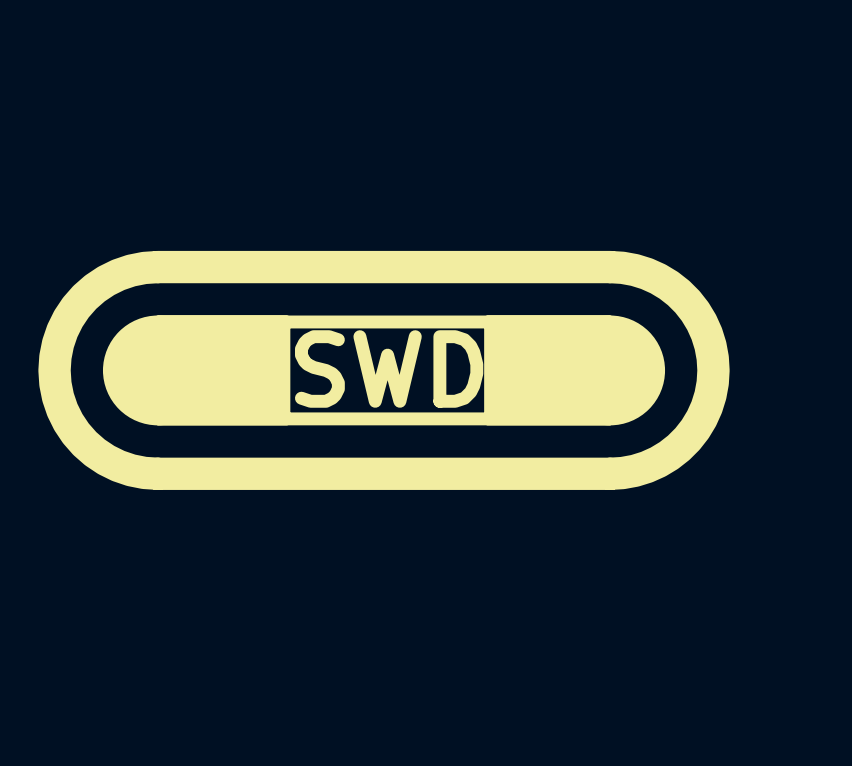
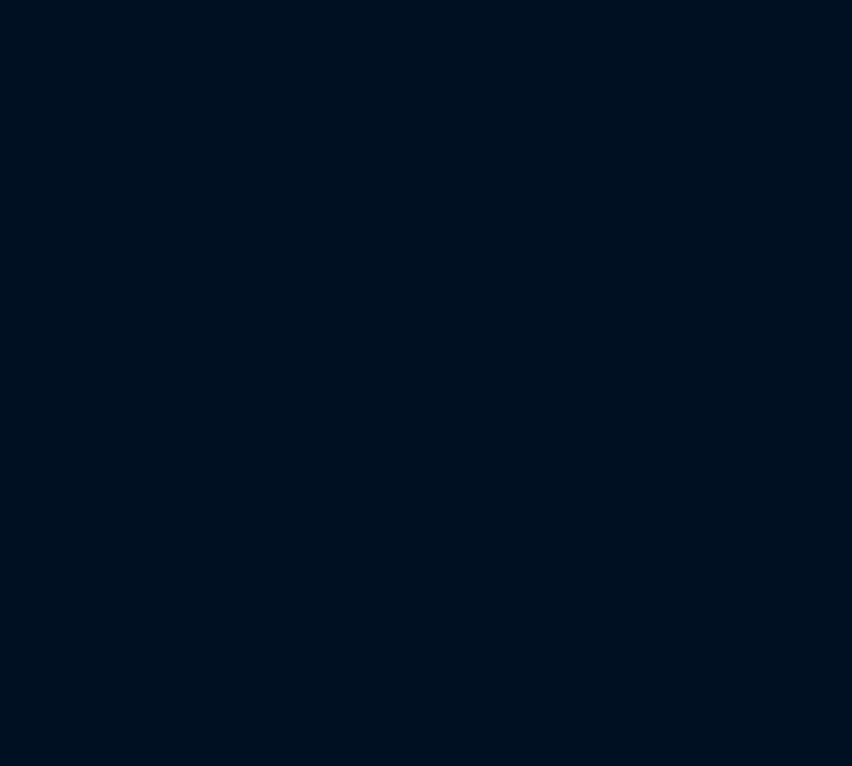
line: (157, 267) (610, 267) (634, 270) (658, 278) (668, 285) (678, 293) (695, 311) (706, 333) (710, 345) (713, 370) (710, 395) (706, 407) (695, 429) (678, 447) (658, 461) (634, 470) (622, 473) (157, 473) (131, 470) (106, 459) (94, 452) (84, 443) (68, 422) (58, 397) (55, 383) (55, 356) (58, 343) (68, 318) (84, 297) (106, 280) (118, 274) (131, 270) (157, 267) -> none
drawing: [102, 315, 666, 426] -> none
text: SWD (389, 368) -> none

